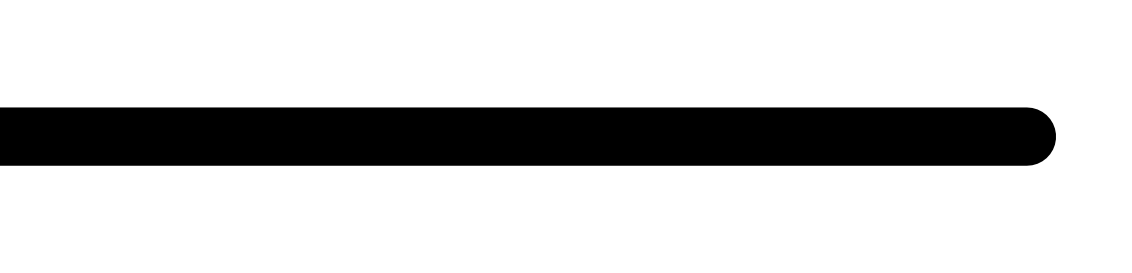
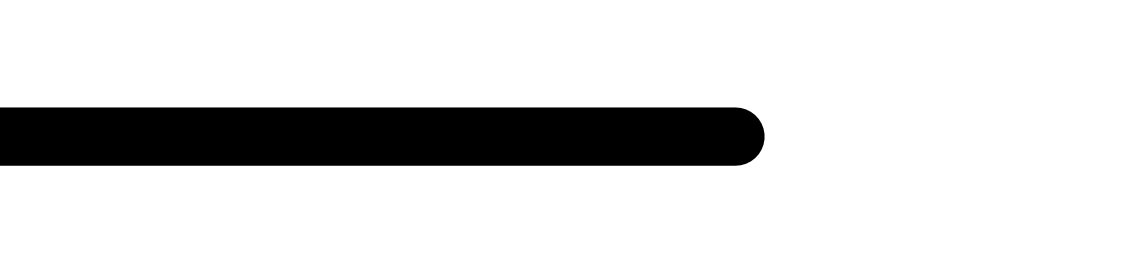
board edge: (1026, 136) (735, 136) -> none

